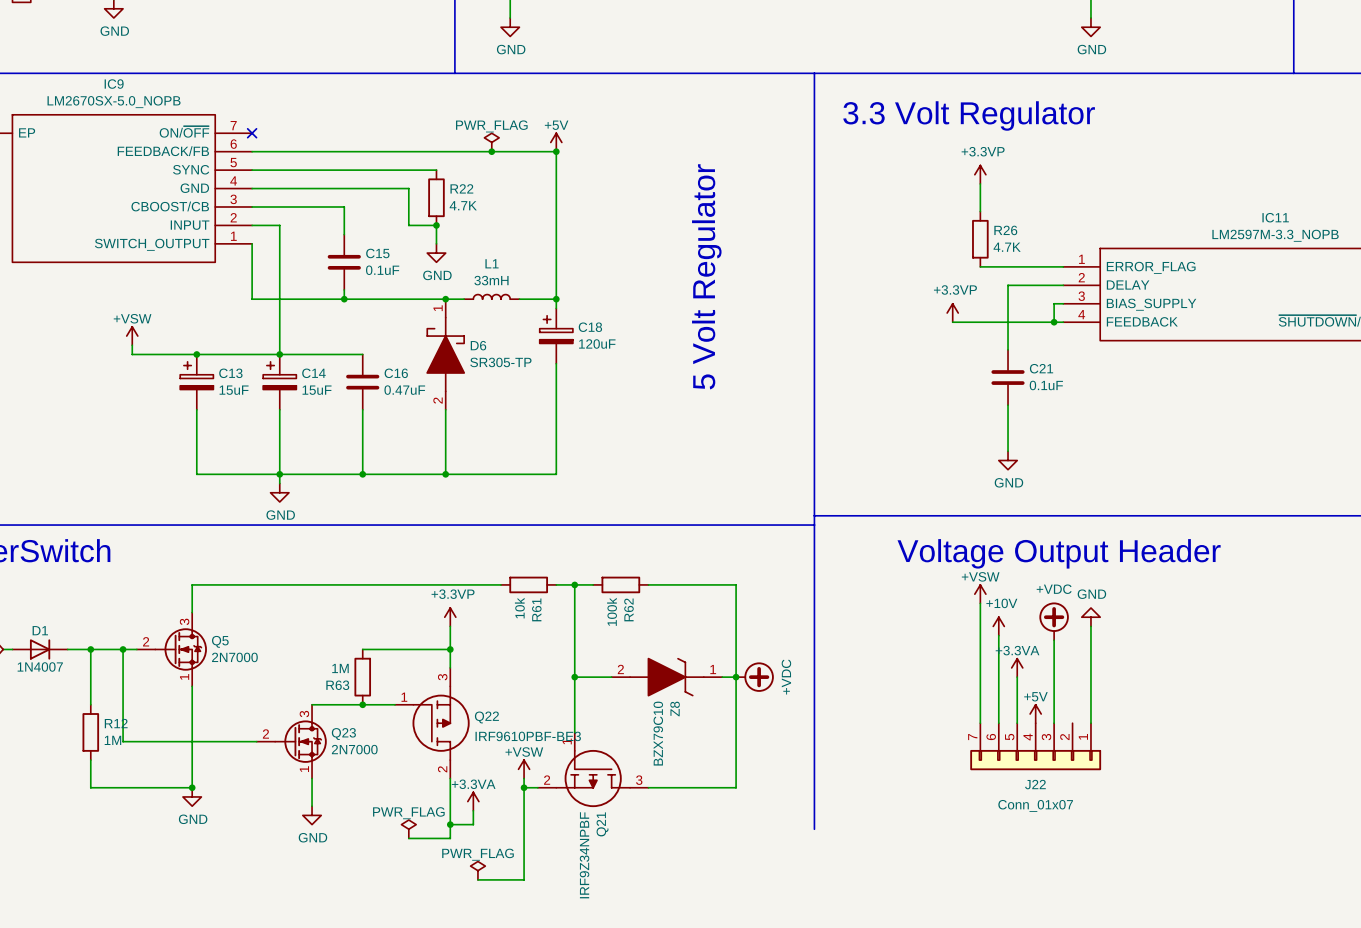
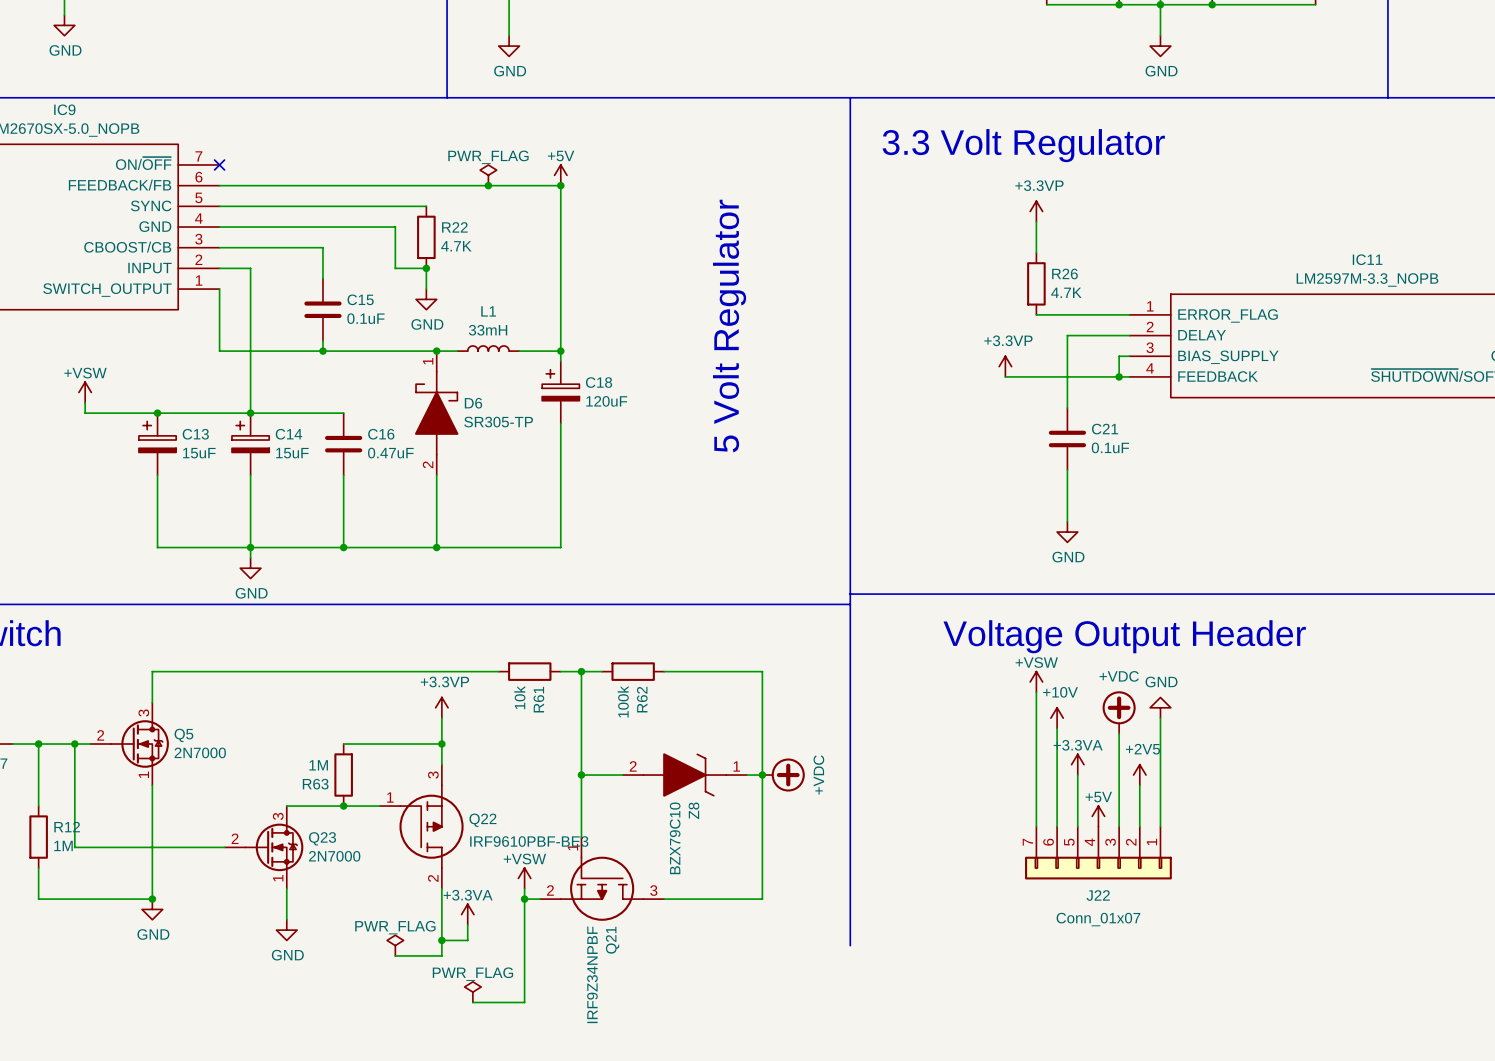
power symbol: none -> +2V5 (1139, 775)
wire: none -> (1139, 785) (1139, 826)

